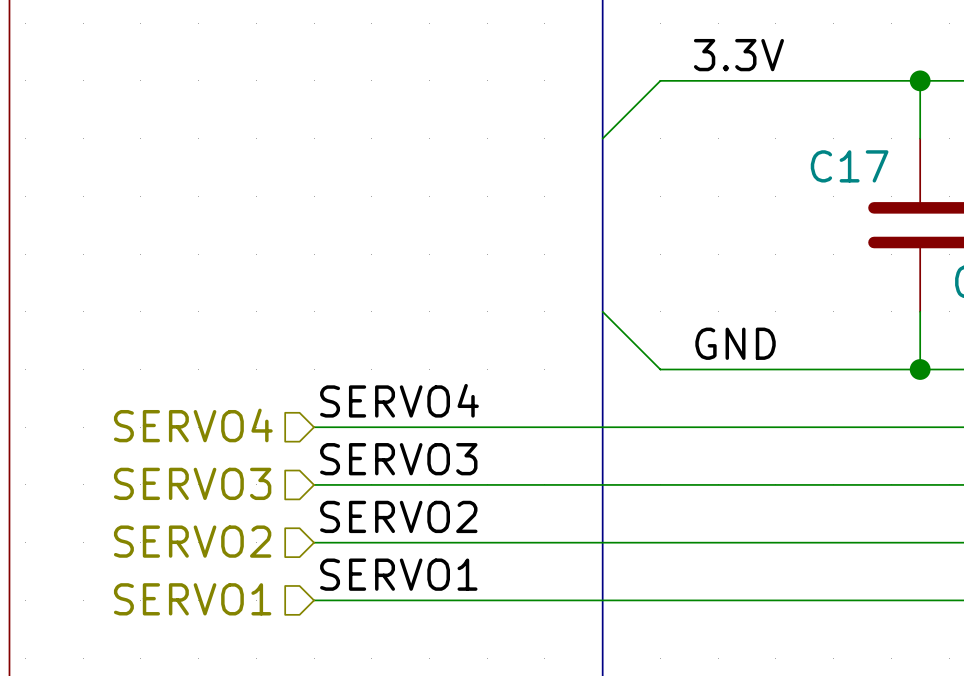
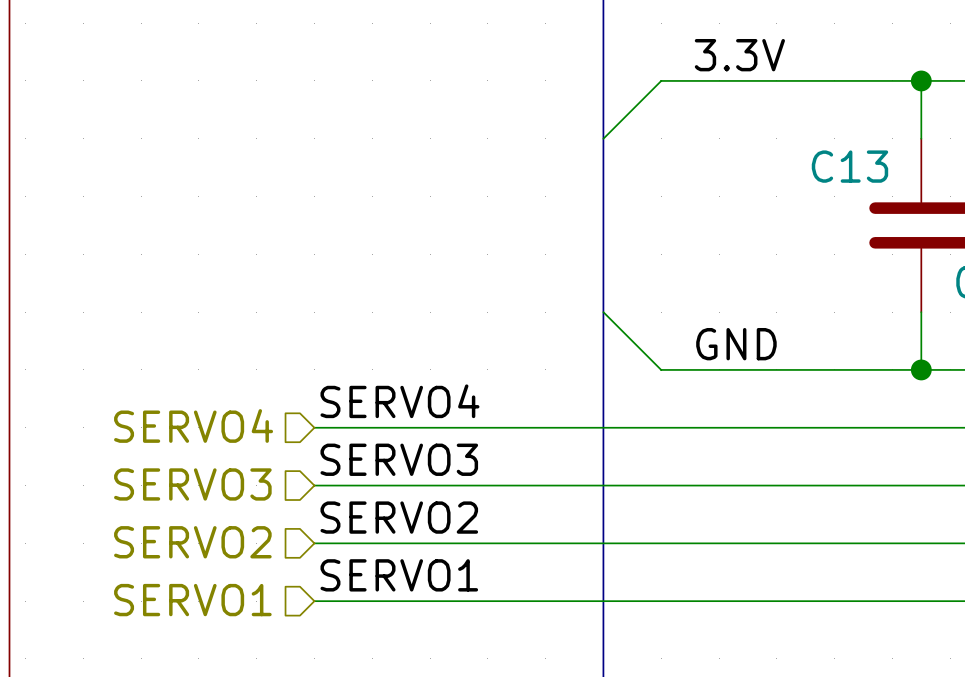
C17 name: C17 (849, 166) -> C13 (849, 166)

